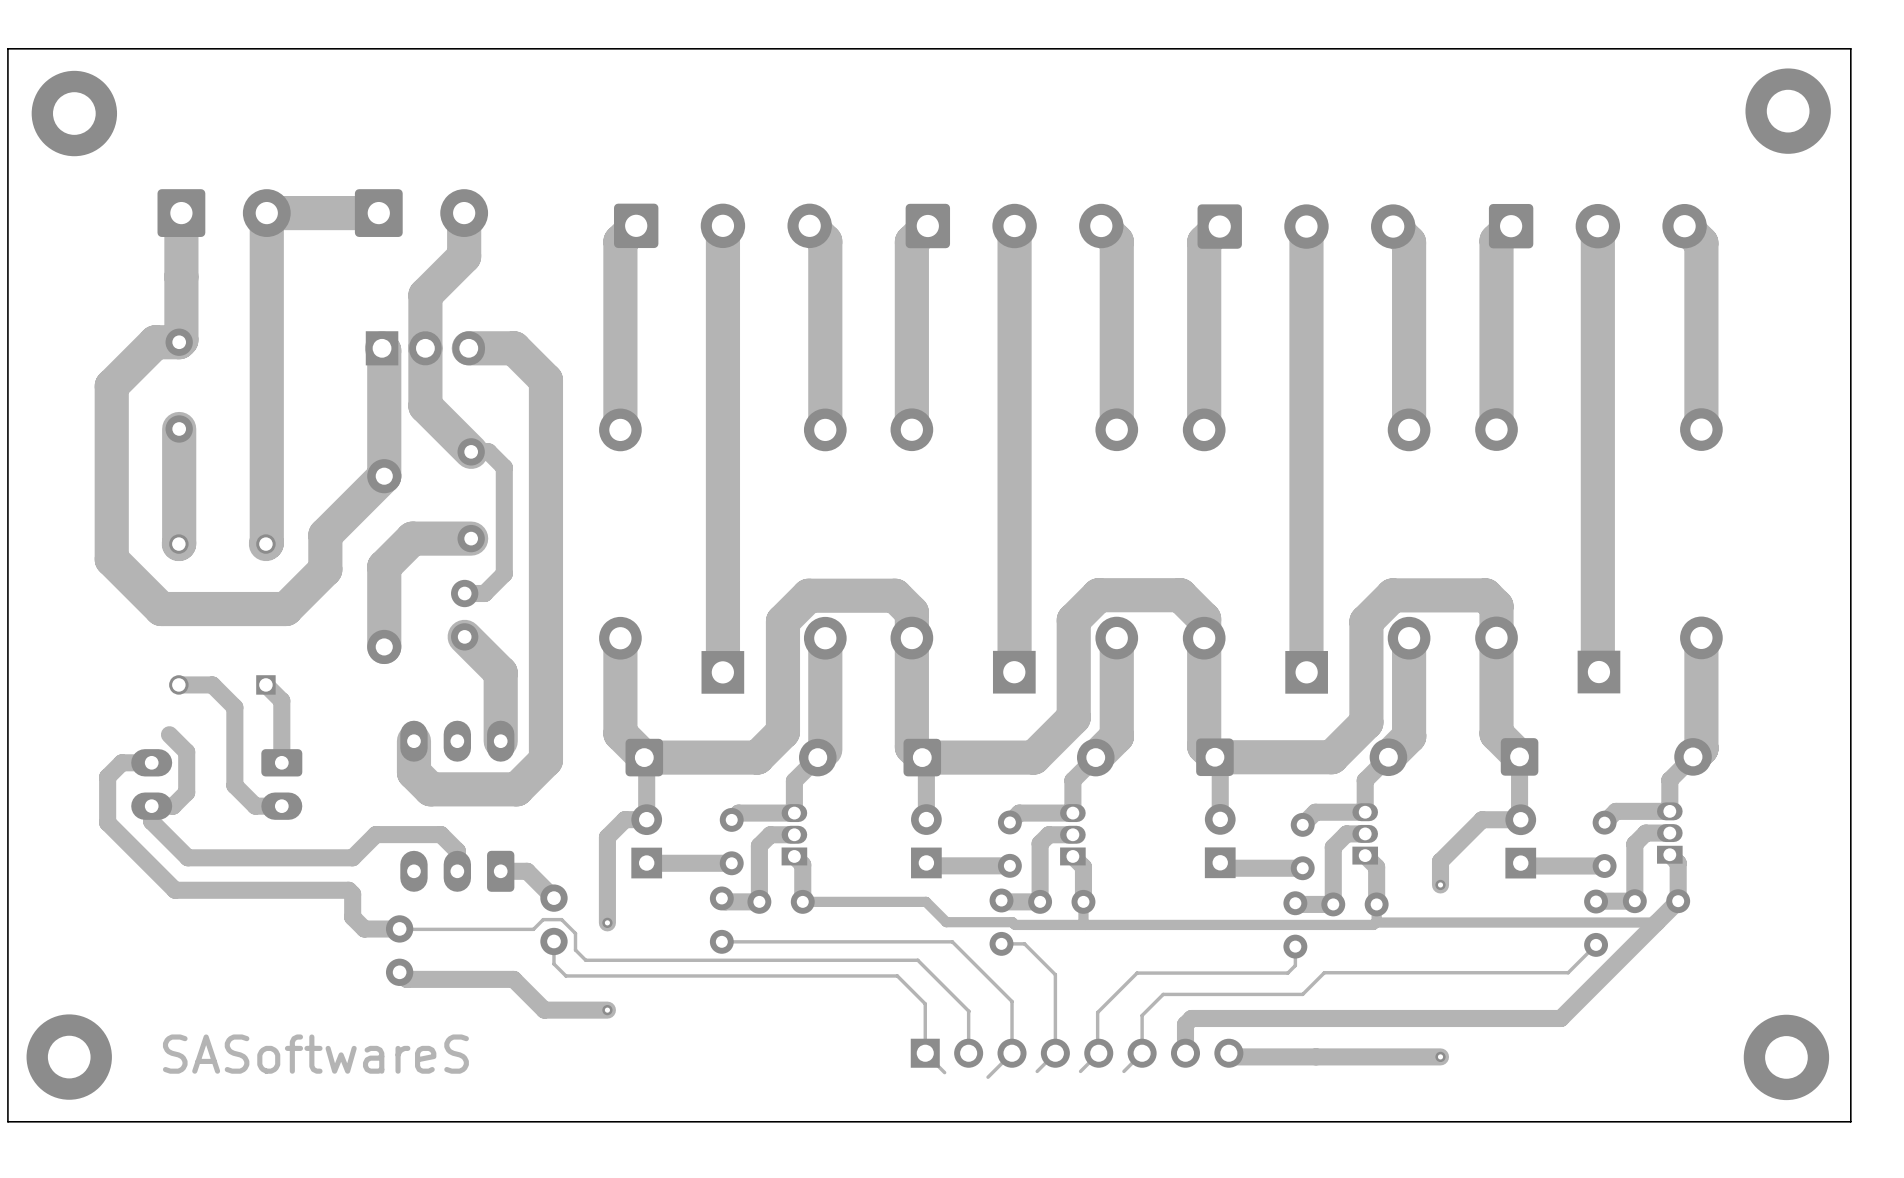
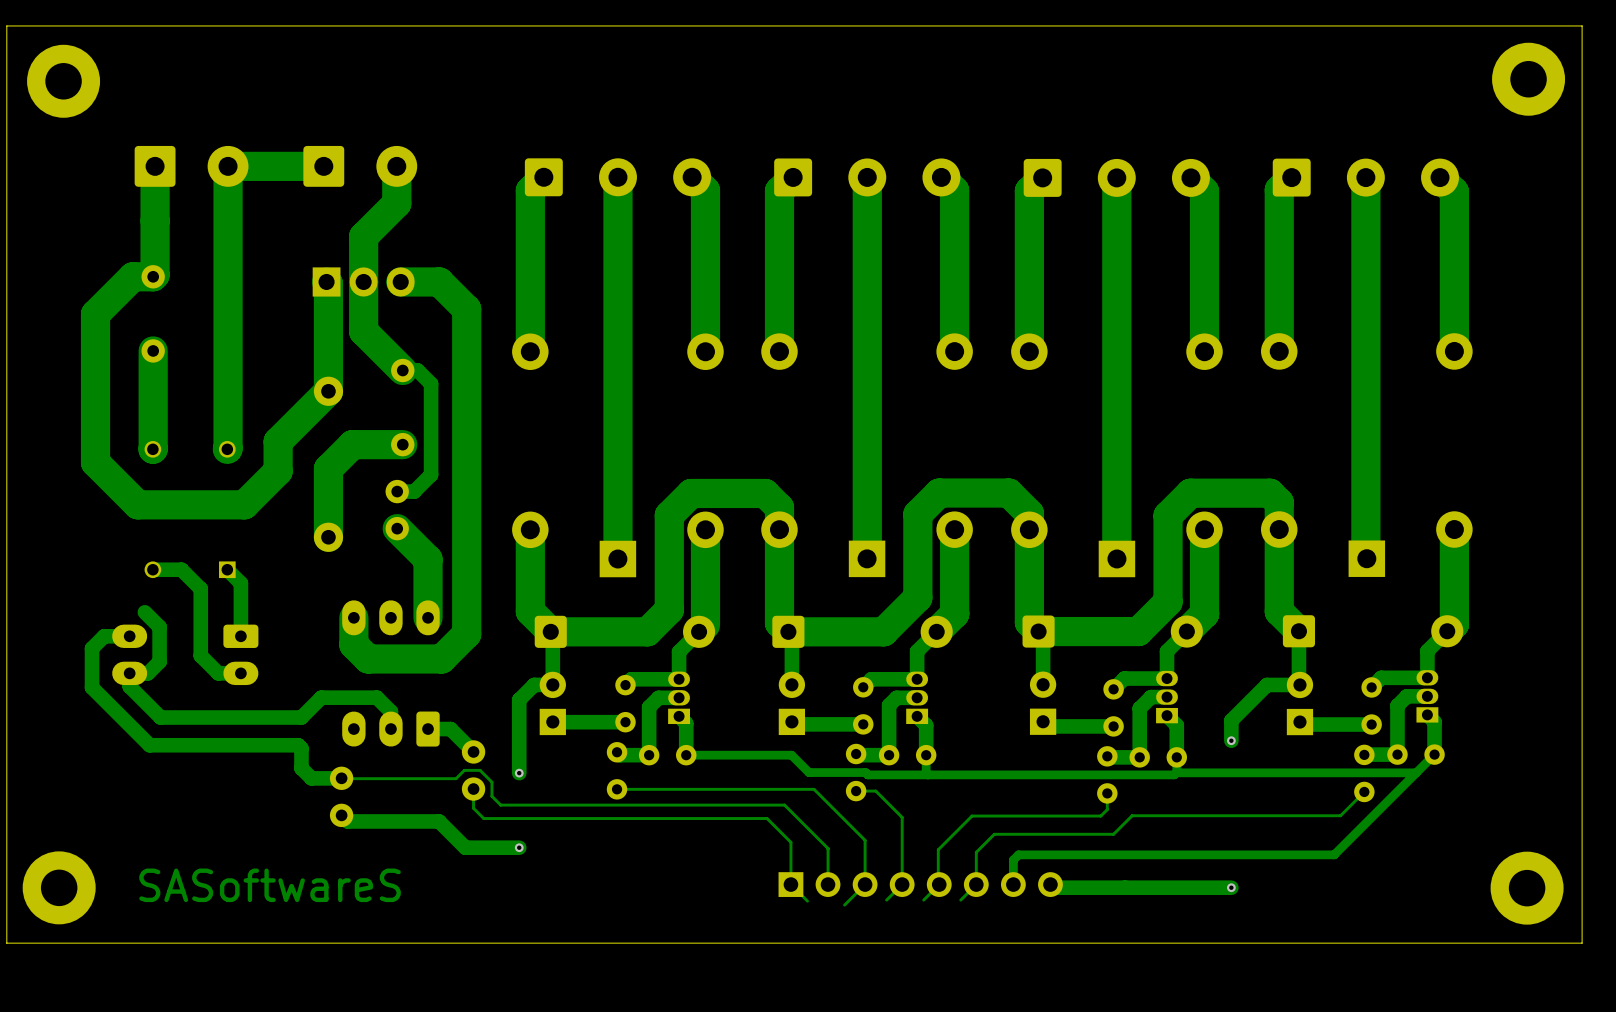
track width: thick (1678, 901) (1560, 1018) (1191, 1018) (1185, 1024) (1185, 1053) -> thin (1434, 754) (1334, 854) (1018, 854) (1013, 860) (1013, 884)

